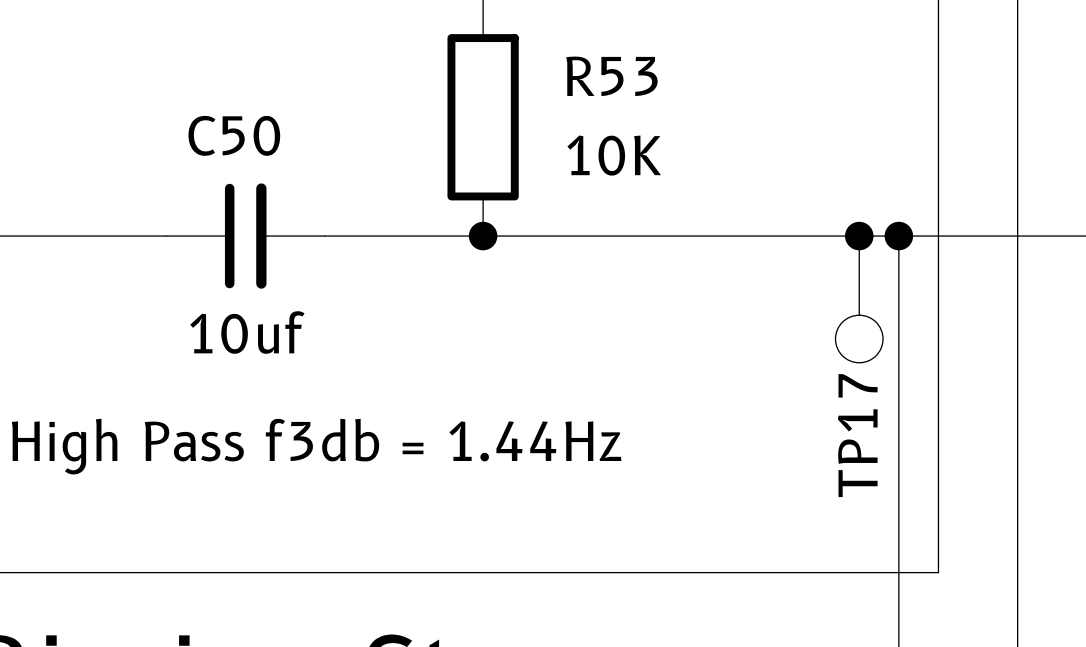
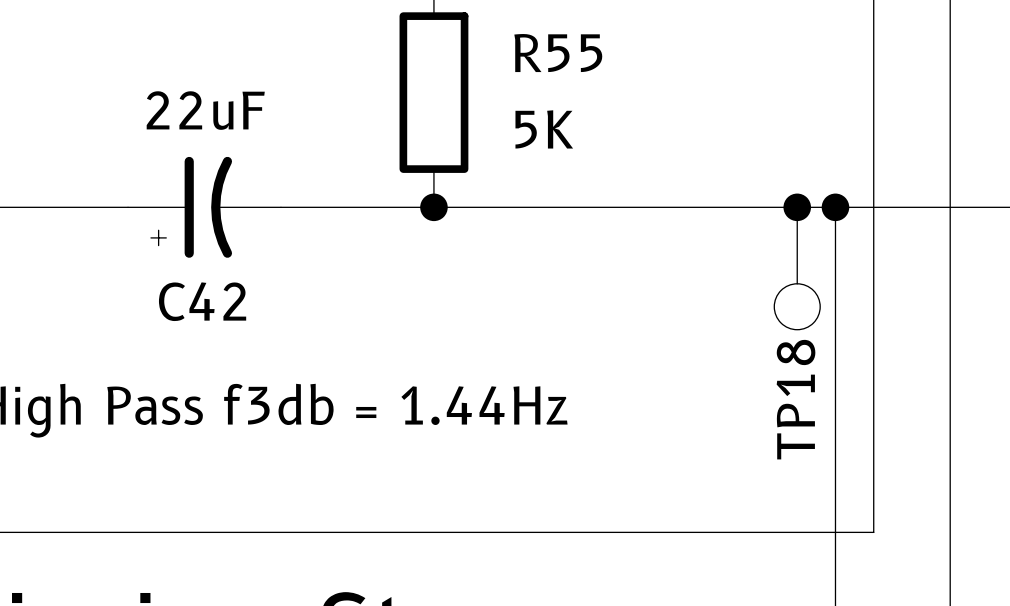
R53 name: R53 (611, 76) -> R55 (558, 53)
R53 value: 10K (614, 155) -> 5K (544, 129)
C50: 10uf (245, 236) -> none
C42: none -> 22uF (204, 207)
TP17 name: TP17 (857, 435) -> TP18 (796, 399)

